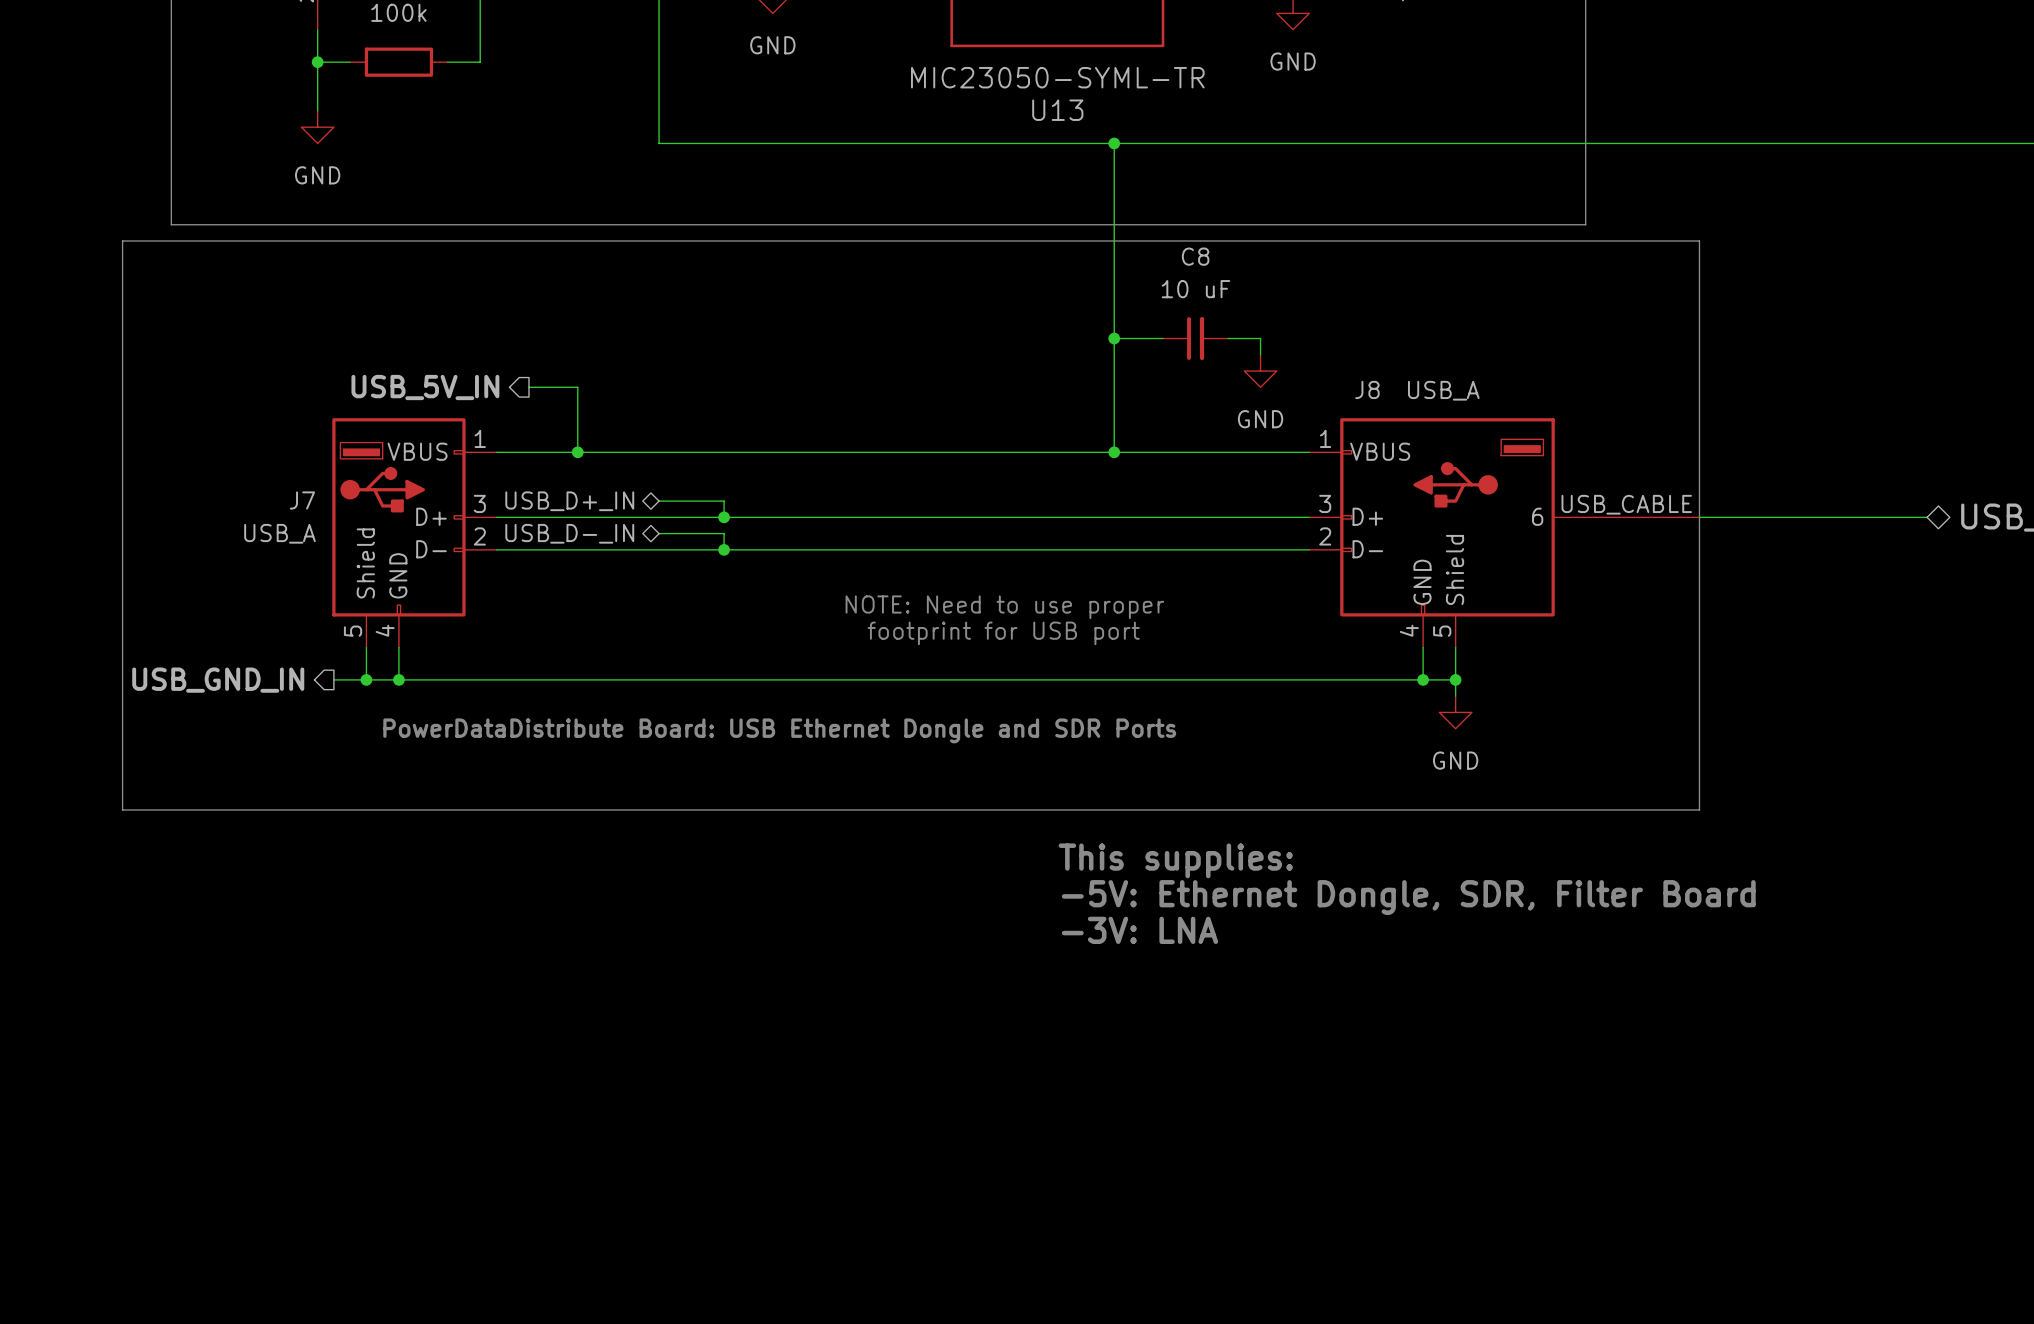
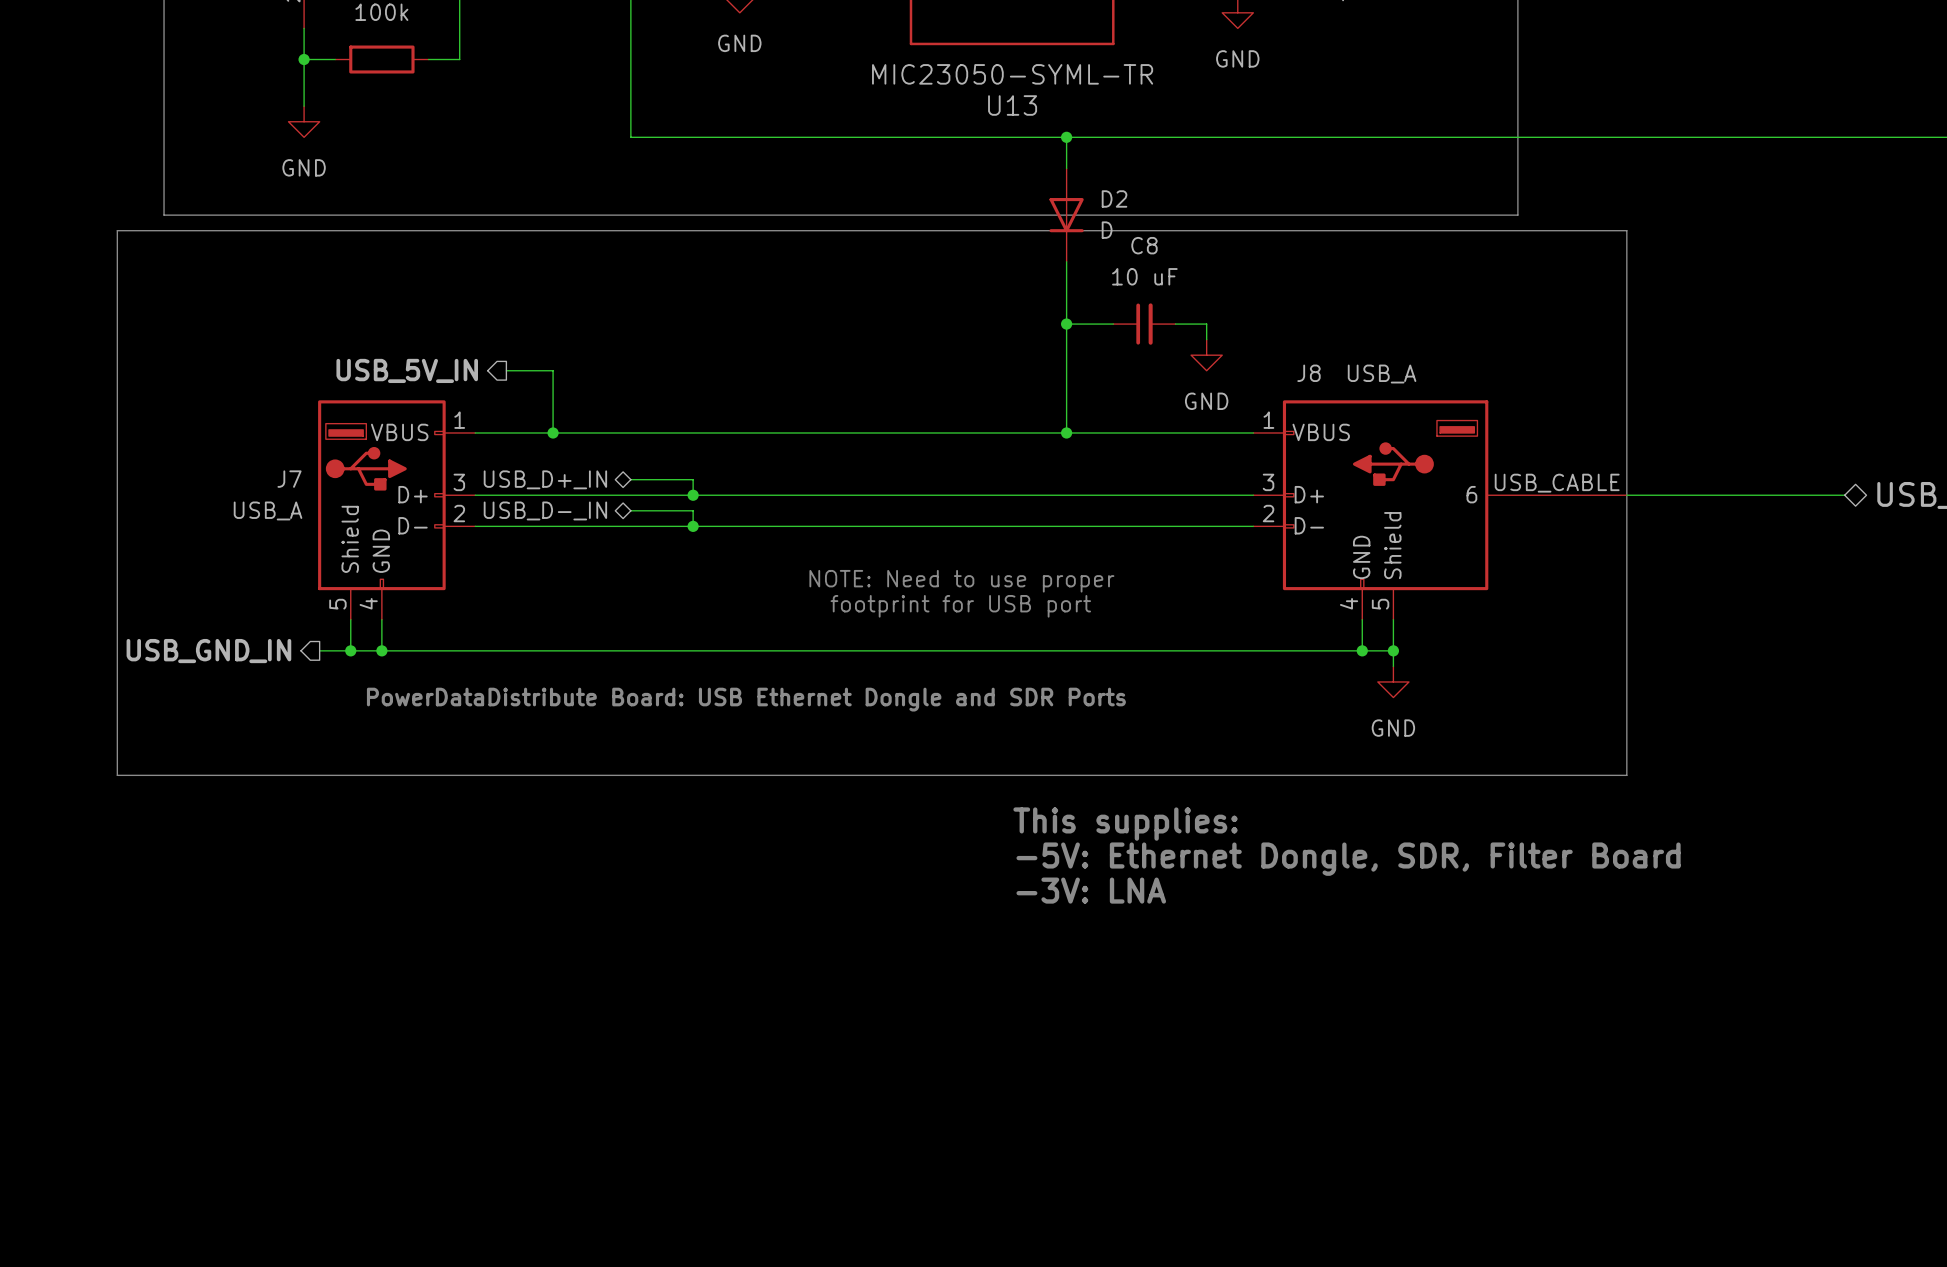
D2: none -> D (1066, 215)

